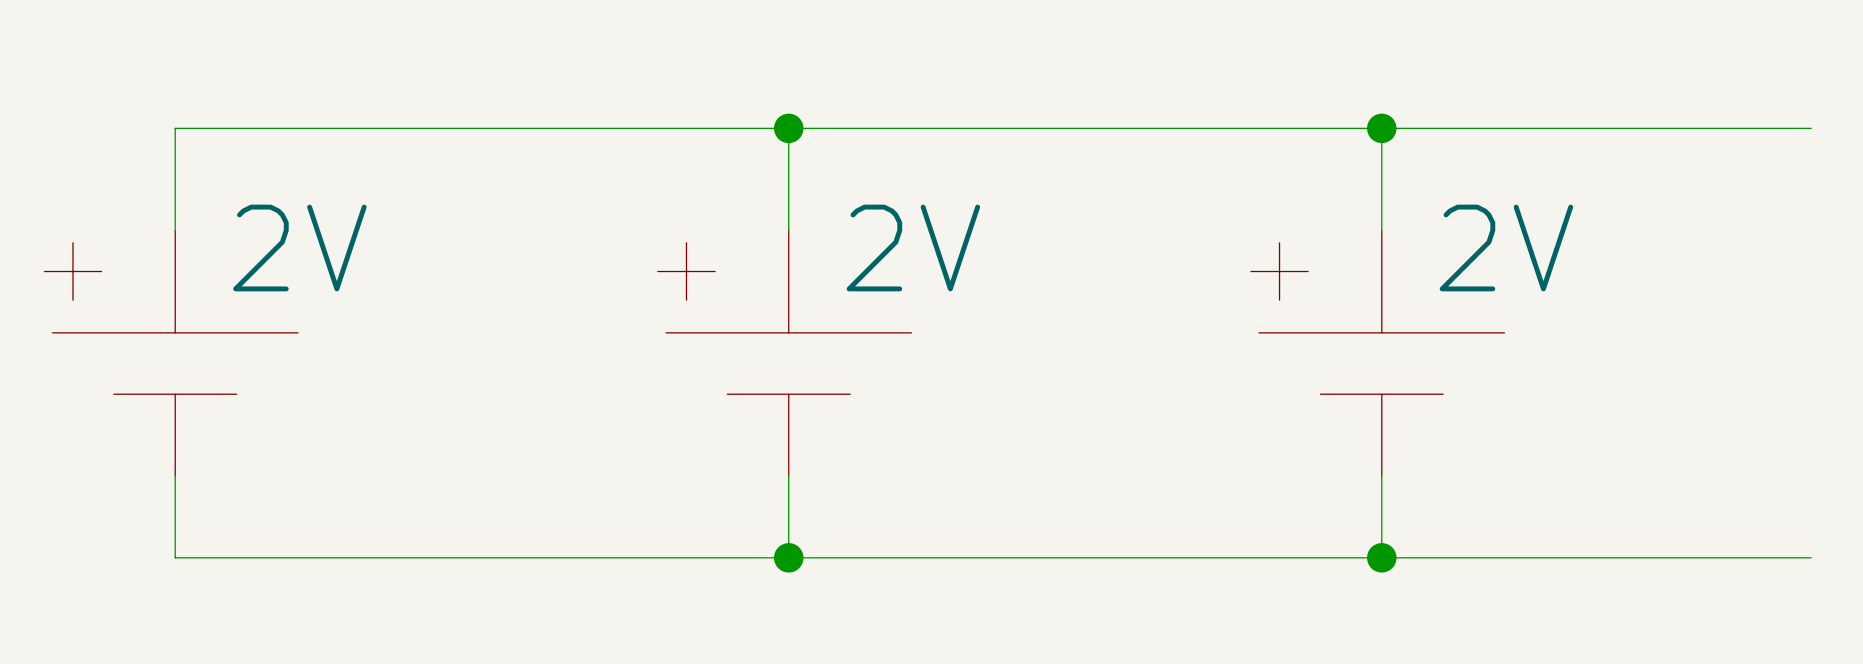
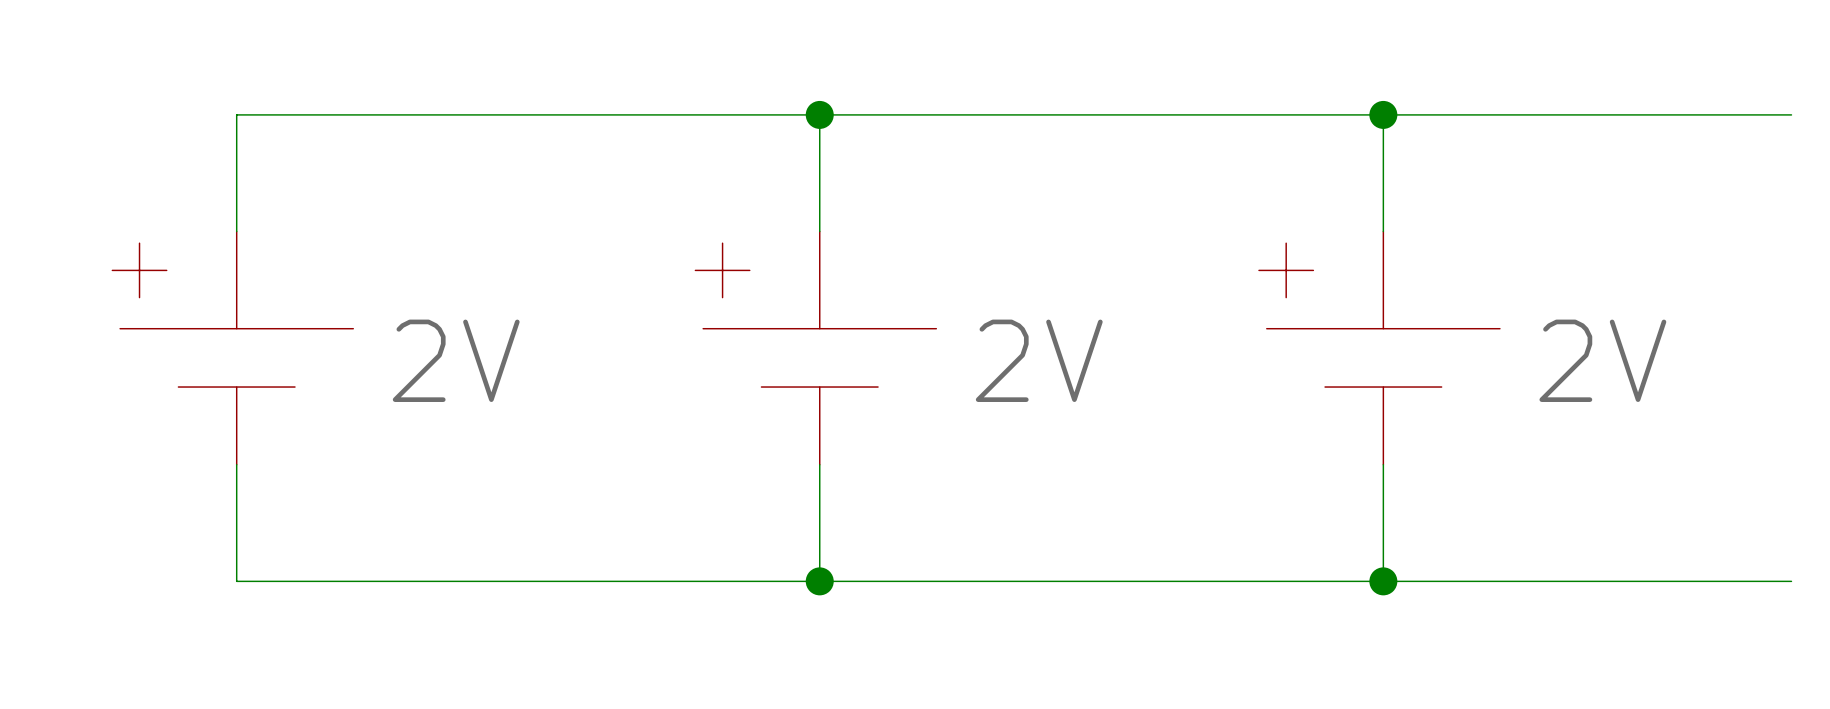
wire: none -> (819, 114) (819, 173)
wire: none -> (1383, 114) (1383, 173)
wire: (175, 128) (1811, 128) -> (236, 173) (236, 114) (1791, 114)
junction position: (788, 128) -> (819, 114)
junction position: (1381, 128) -> (1383, 114)
part value position: 2V (299, 248) -> 2V (456, 360)
part value position: 2V (913, 248) -> 2V (1039, 360)
part value position: 2V (1506, 248) -> 2V (1602, 360)
part position: (171, 353) -> (232, 348)
part position: (784, 353) -> (815, 348)
part position: (1377, 353) -> (1379, 348)

